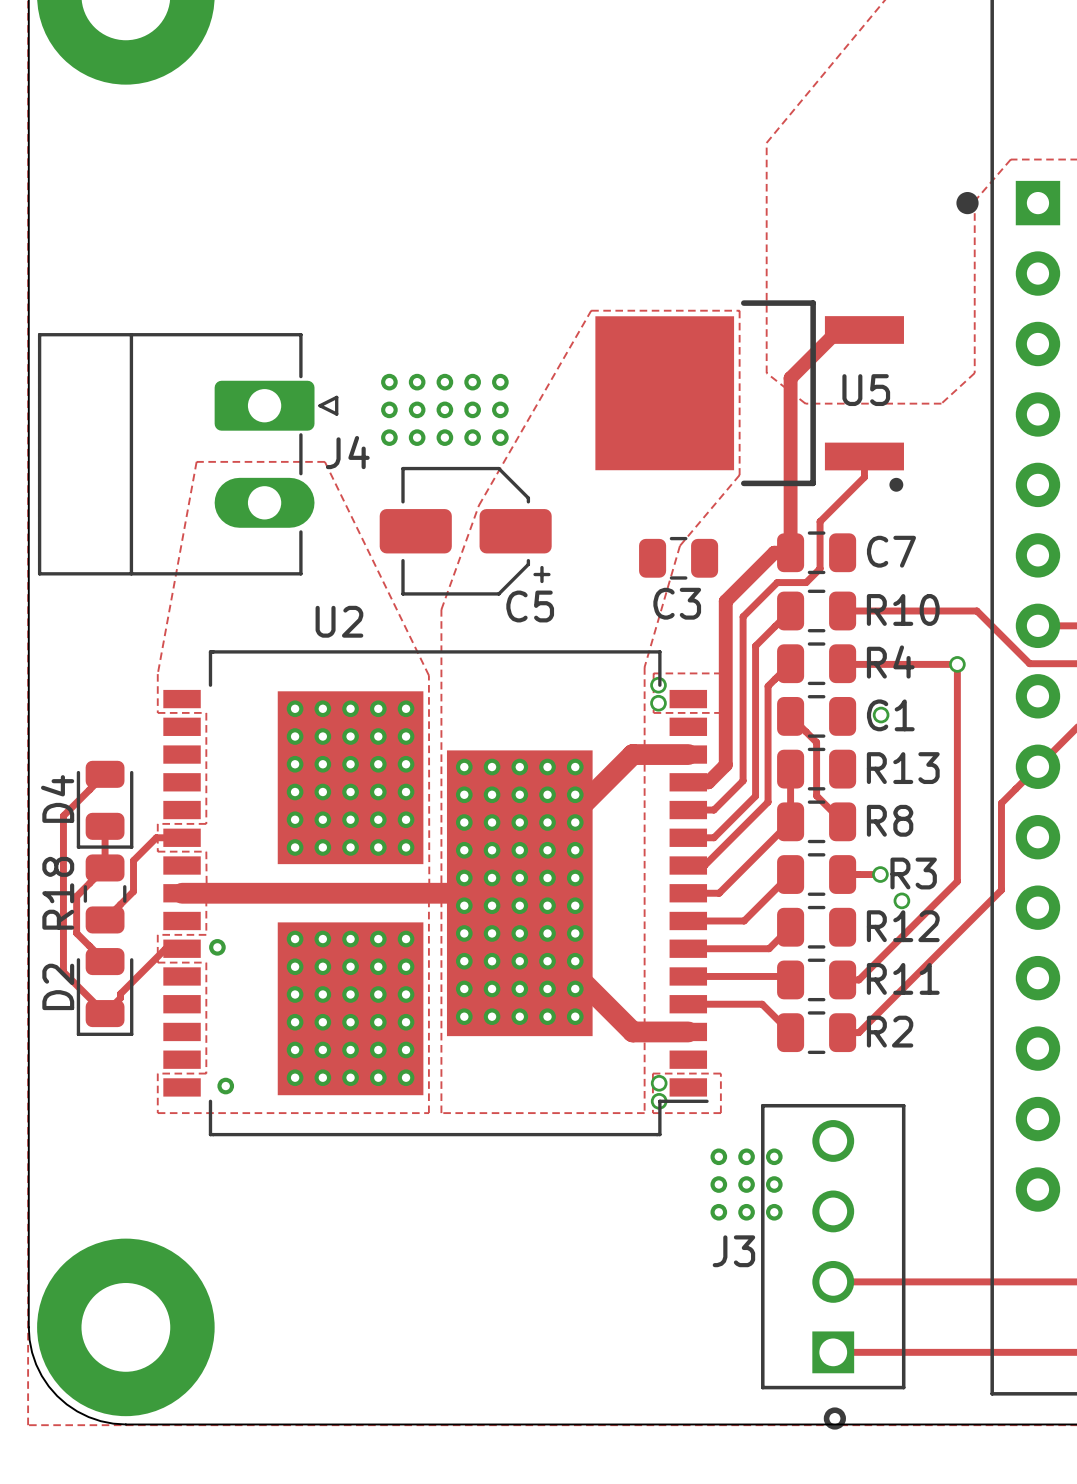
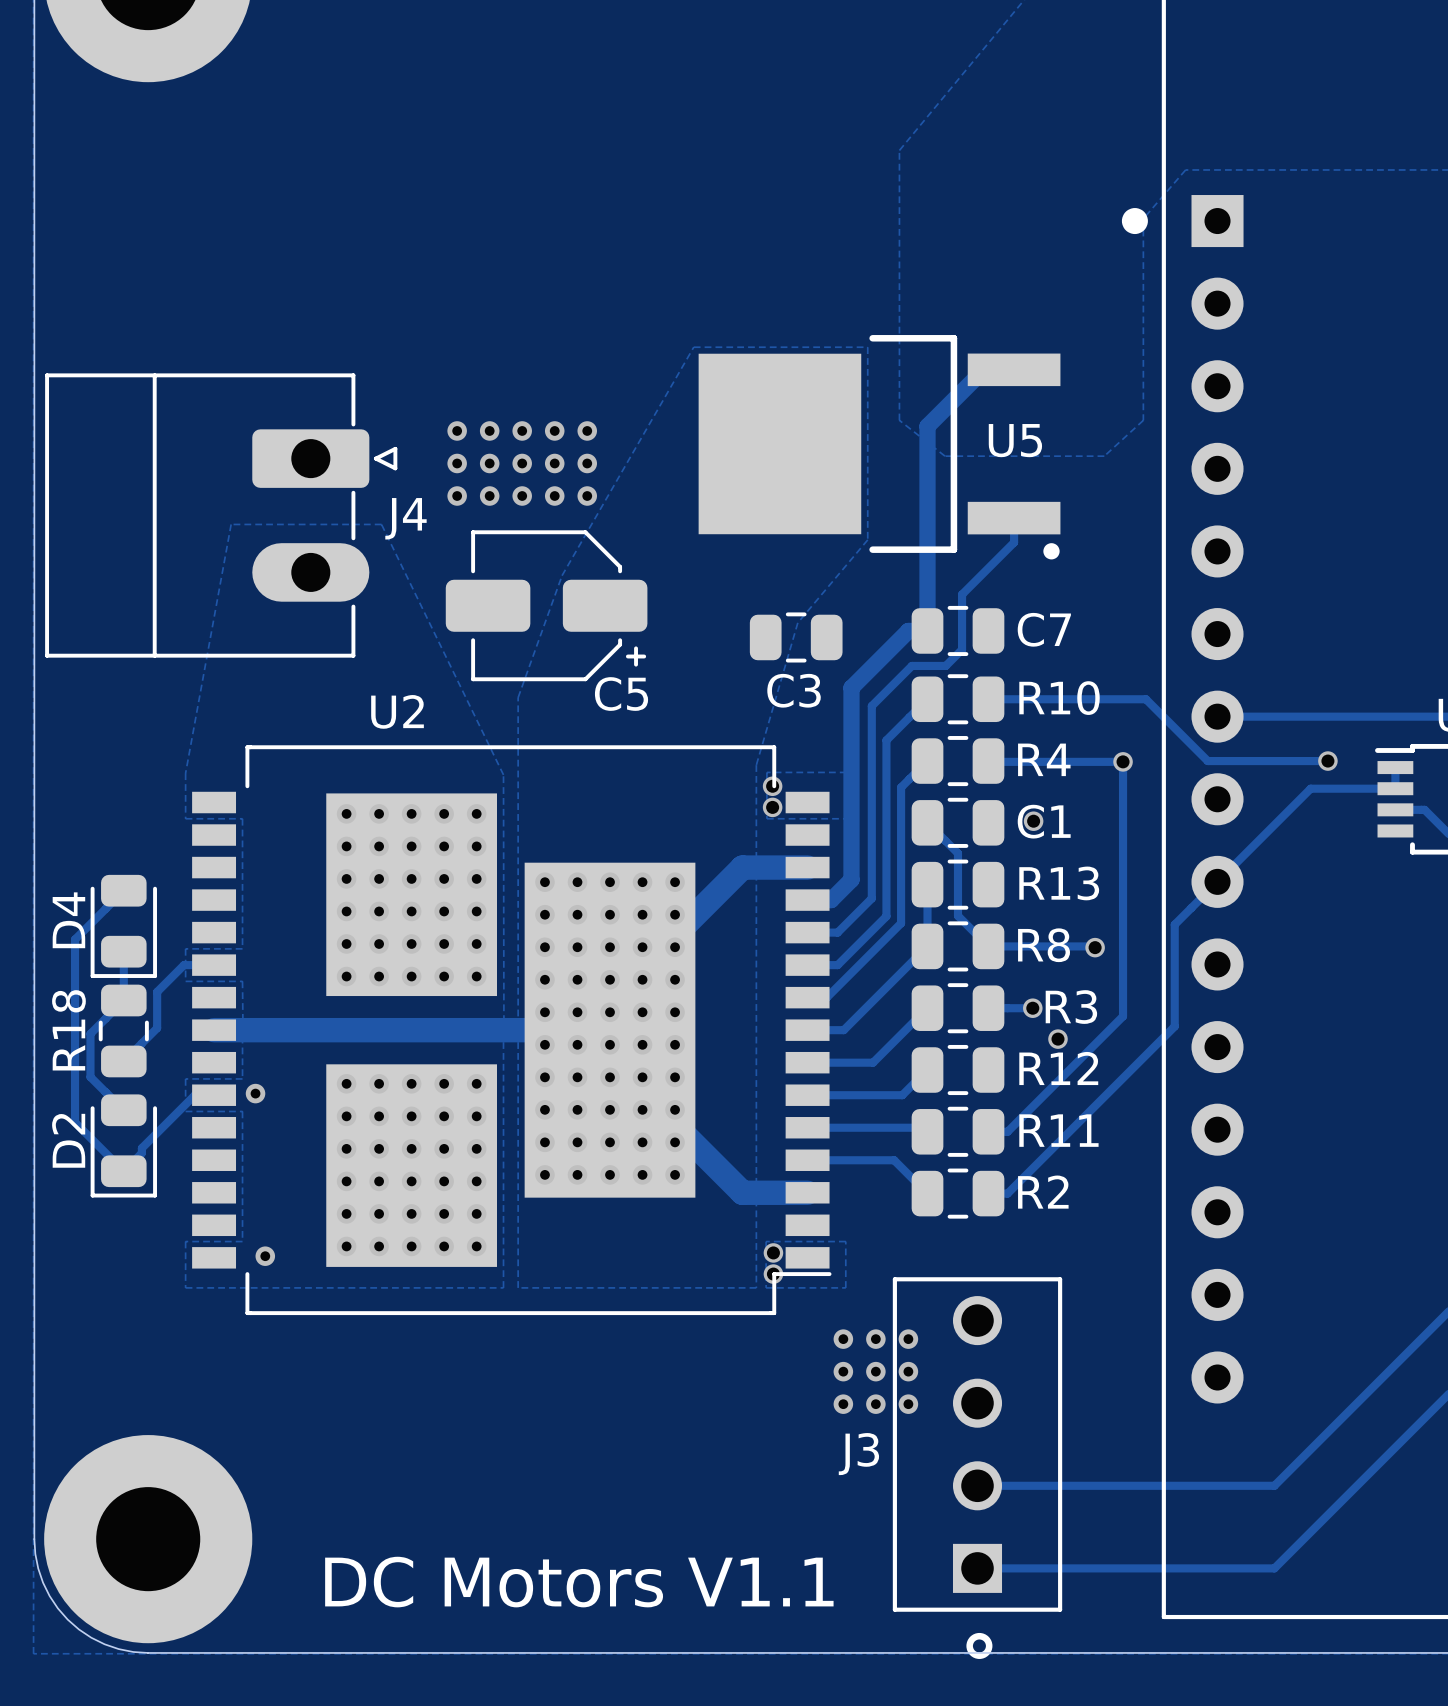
track: none -> (988, 946) (1095, 947)
via: none -> (1095, 947)
text: none -> DC Motors V1.1 (579, 1582)

